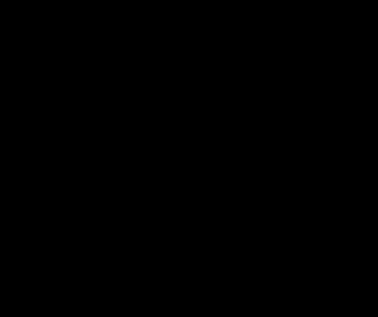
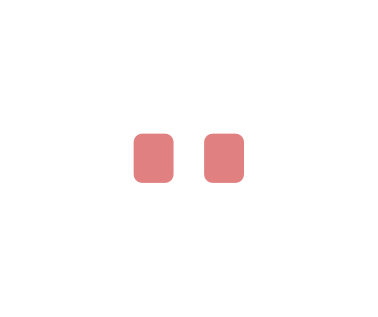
part: none -> (188, 158)

